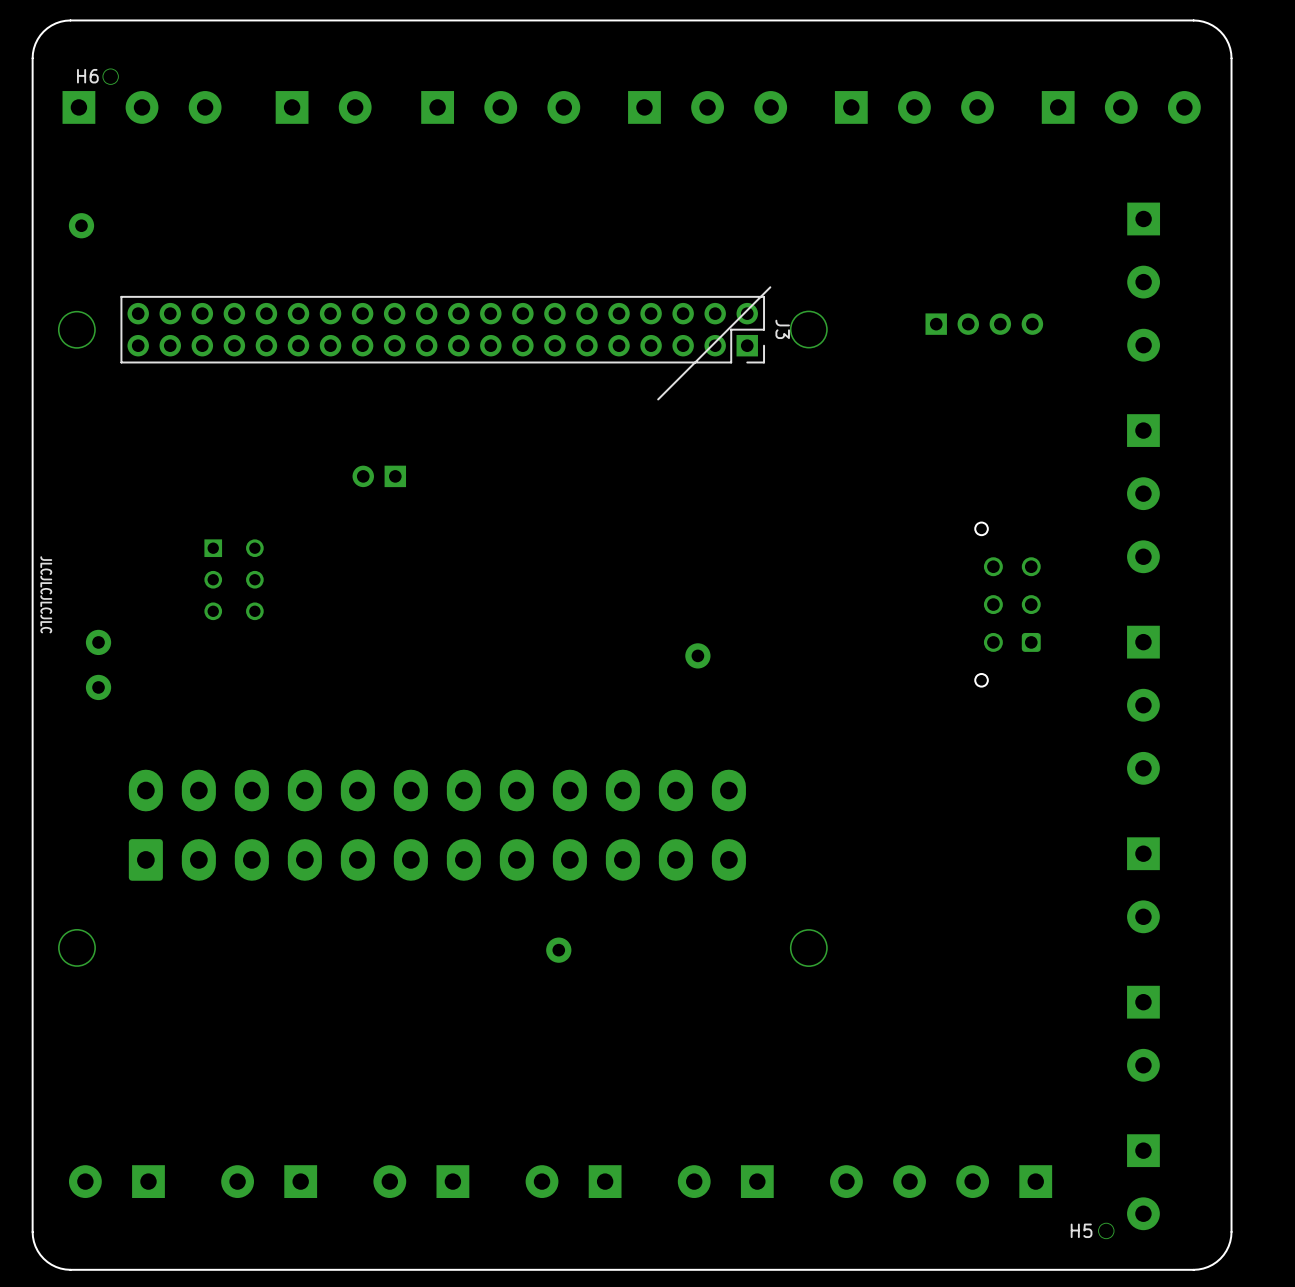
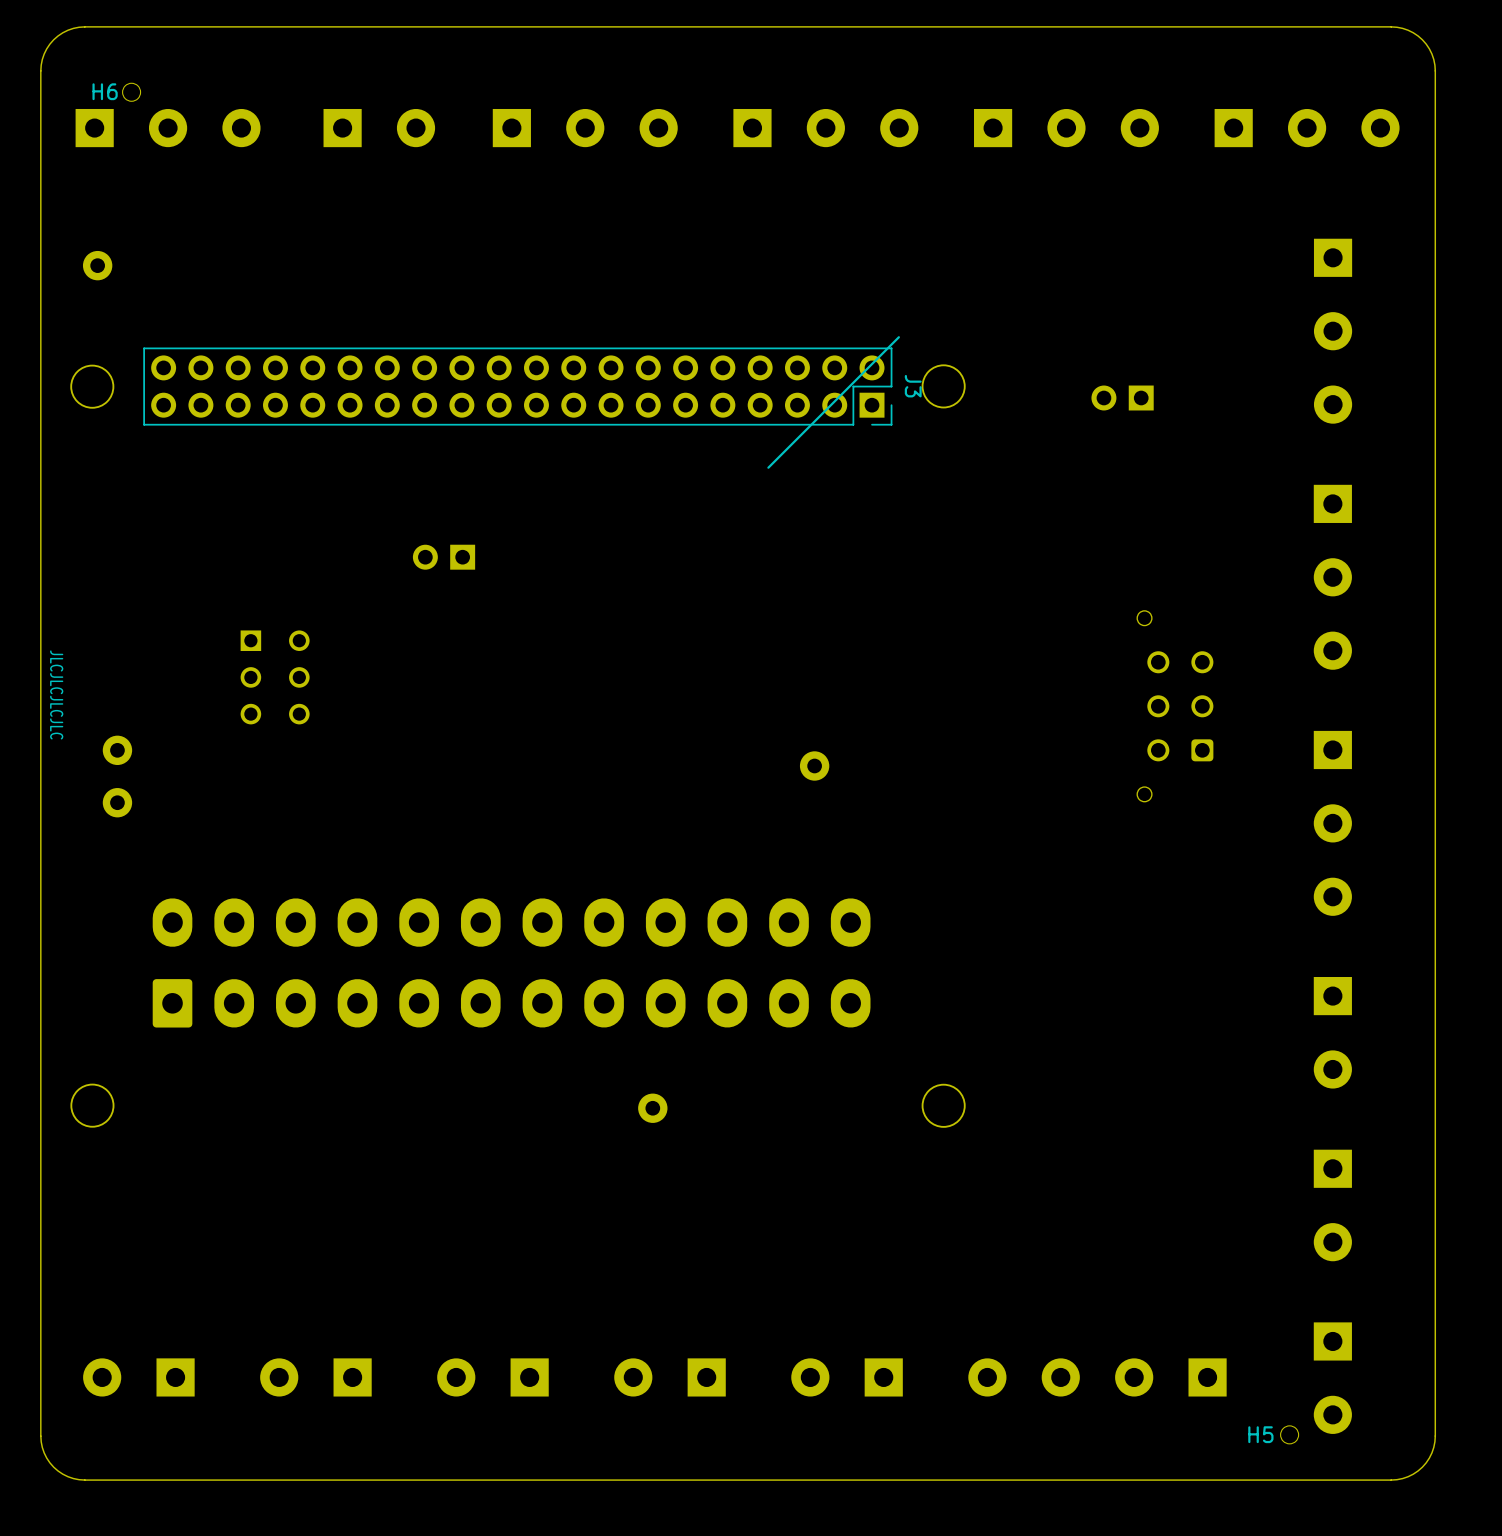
part: (984, 324) -> none
part: none -> (1122, 398)

